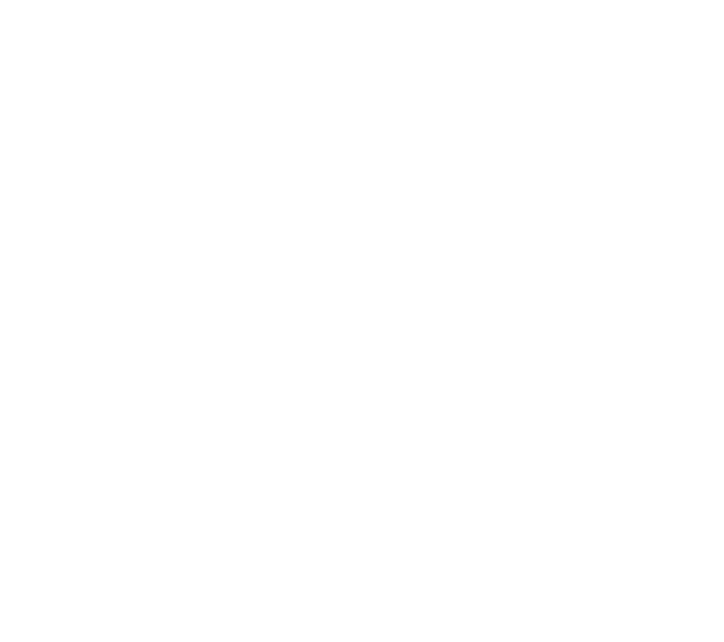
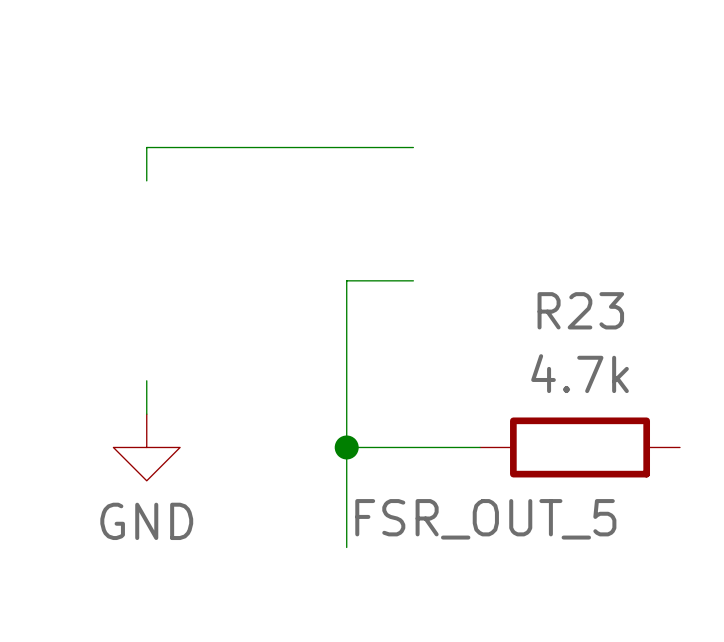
wire: none -> (413, 147) (146, 147) (146, 180)
wire: none -> (413, 280) (346, 280) (346, 547)
wire: none -> (146, 380) (146, 414)
power symbol: none -> GND (146, 447)
wire: none -> (346, 447) (480, 447)
junction: none -> (346, 447)
R23: none -> 4.7k (580, 447)
label: none -> FSR_OUT_5 (485, 519)

